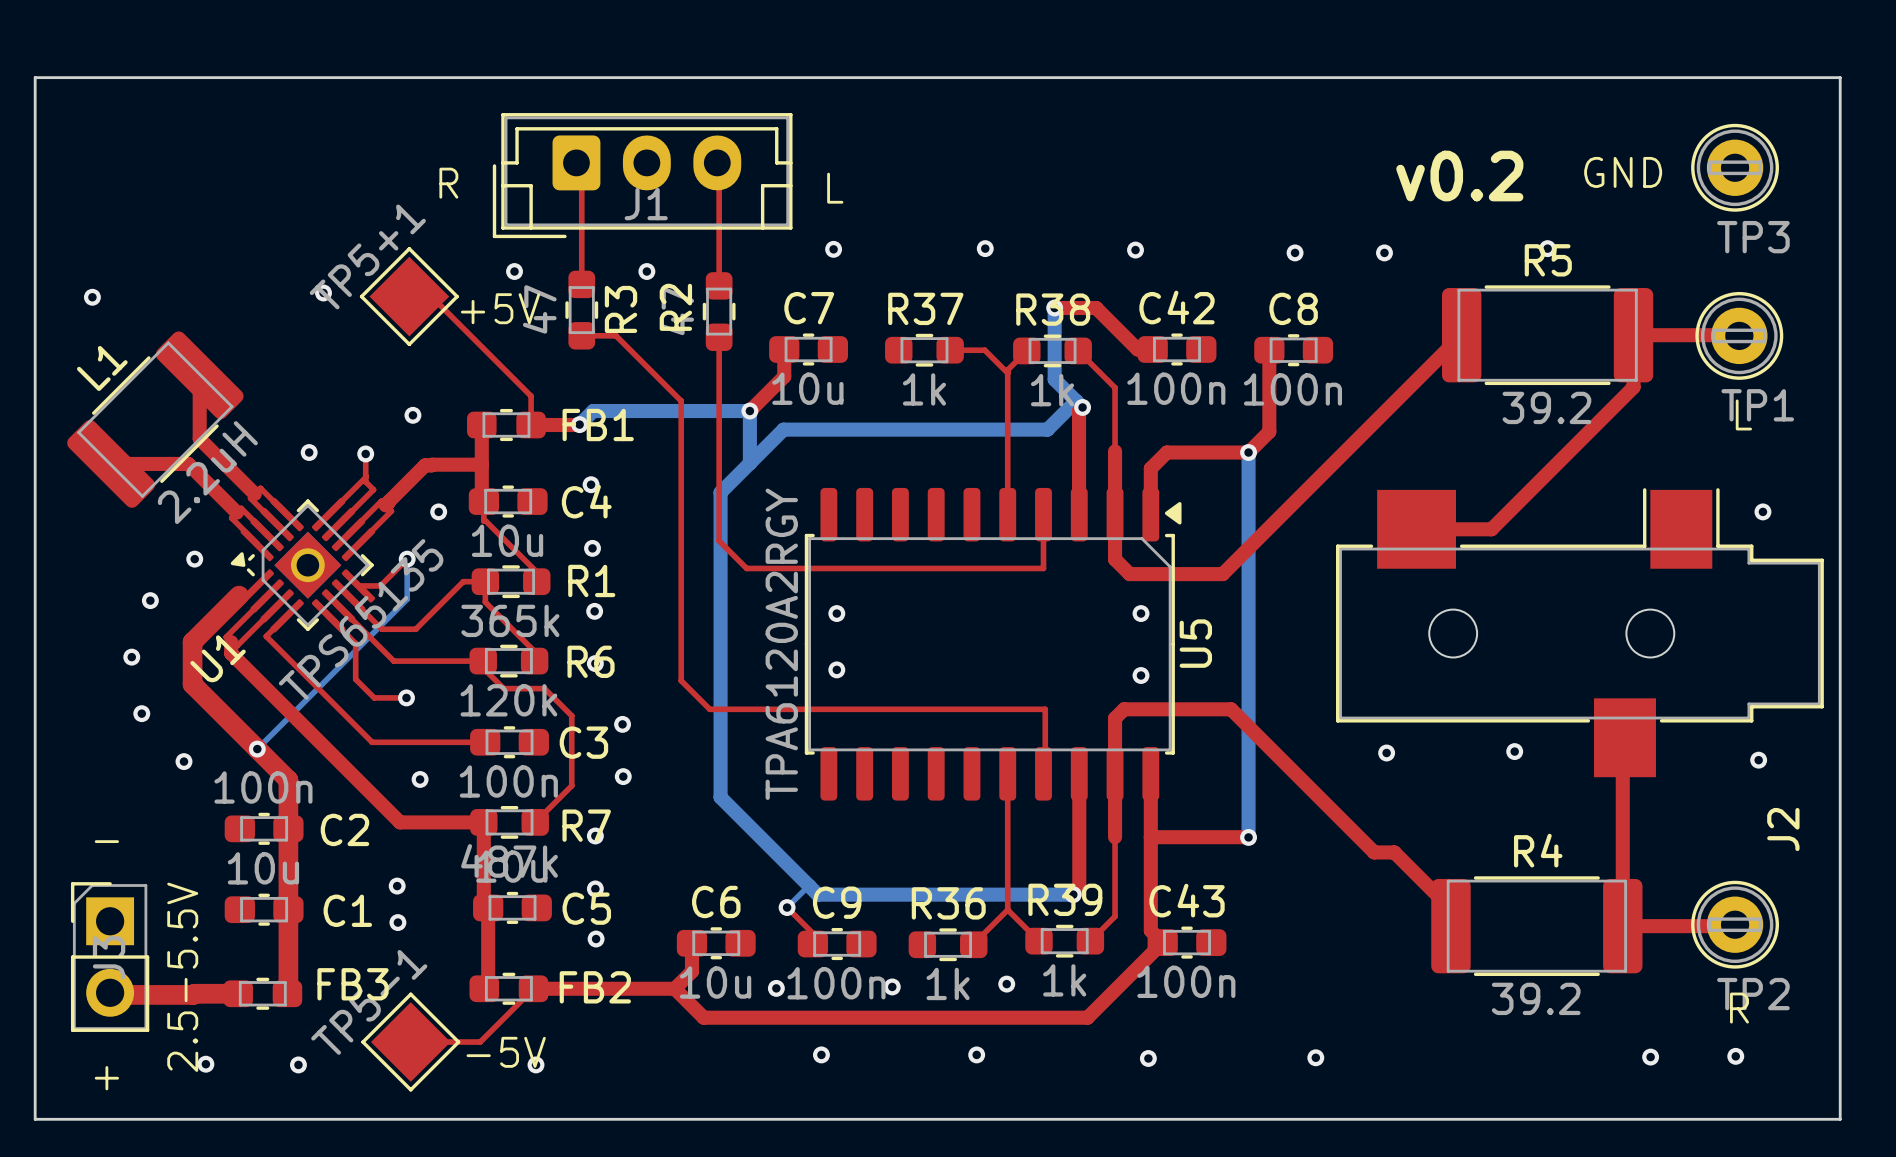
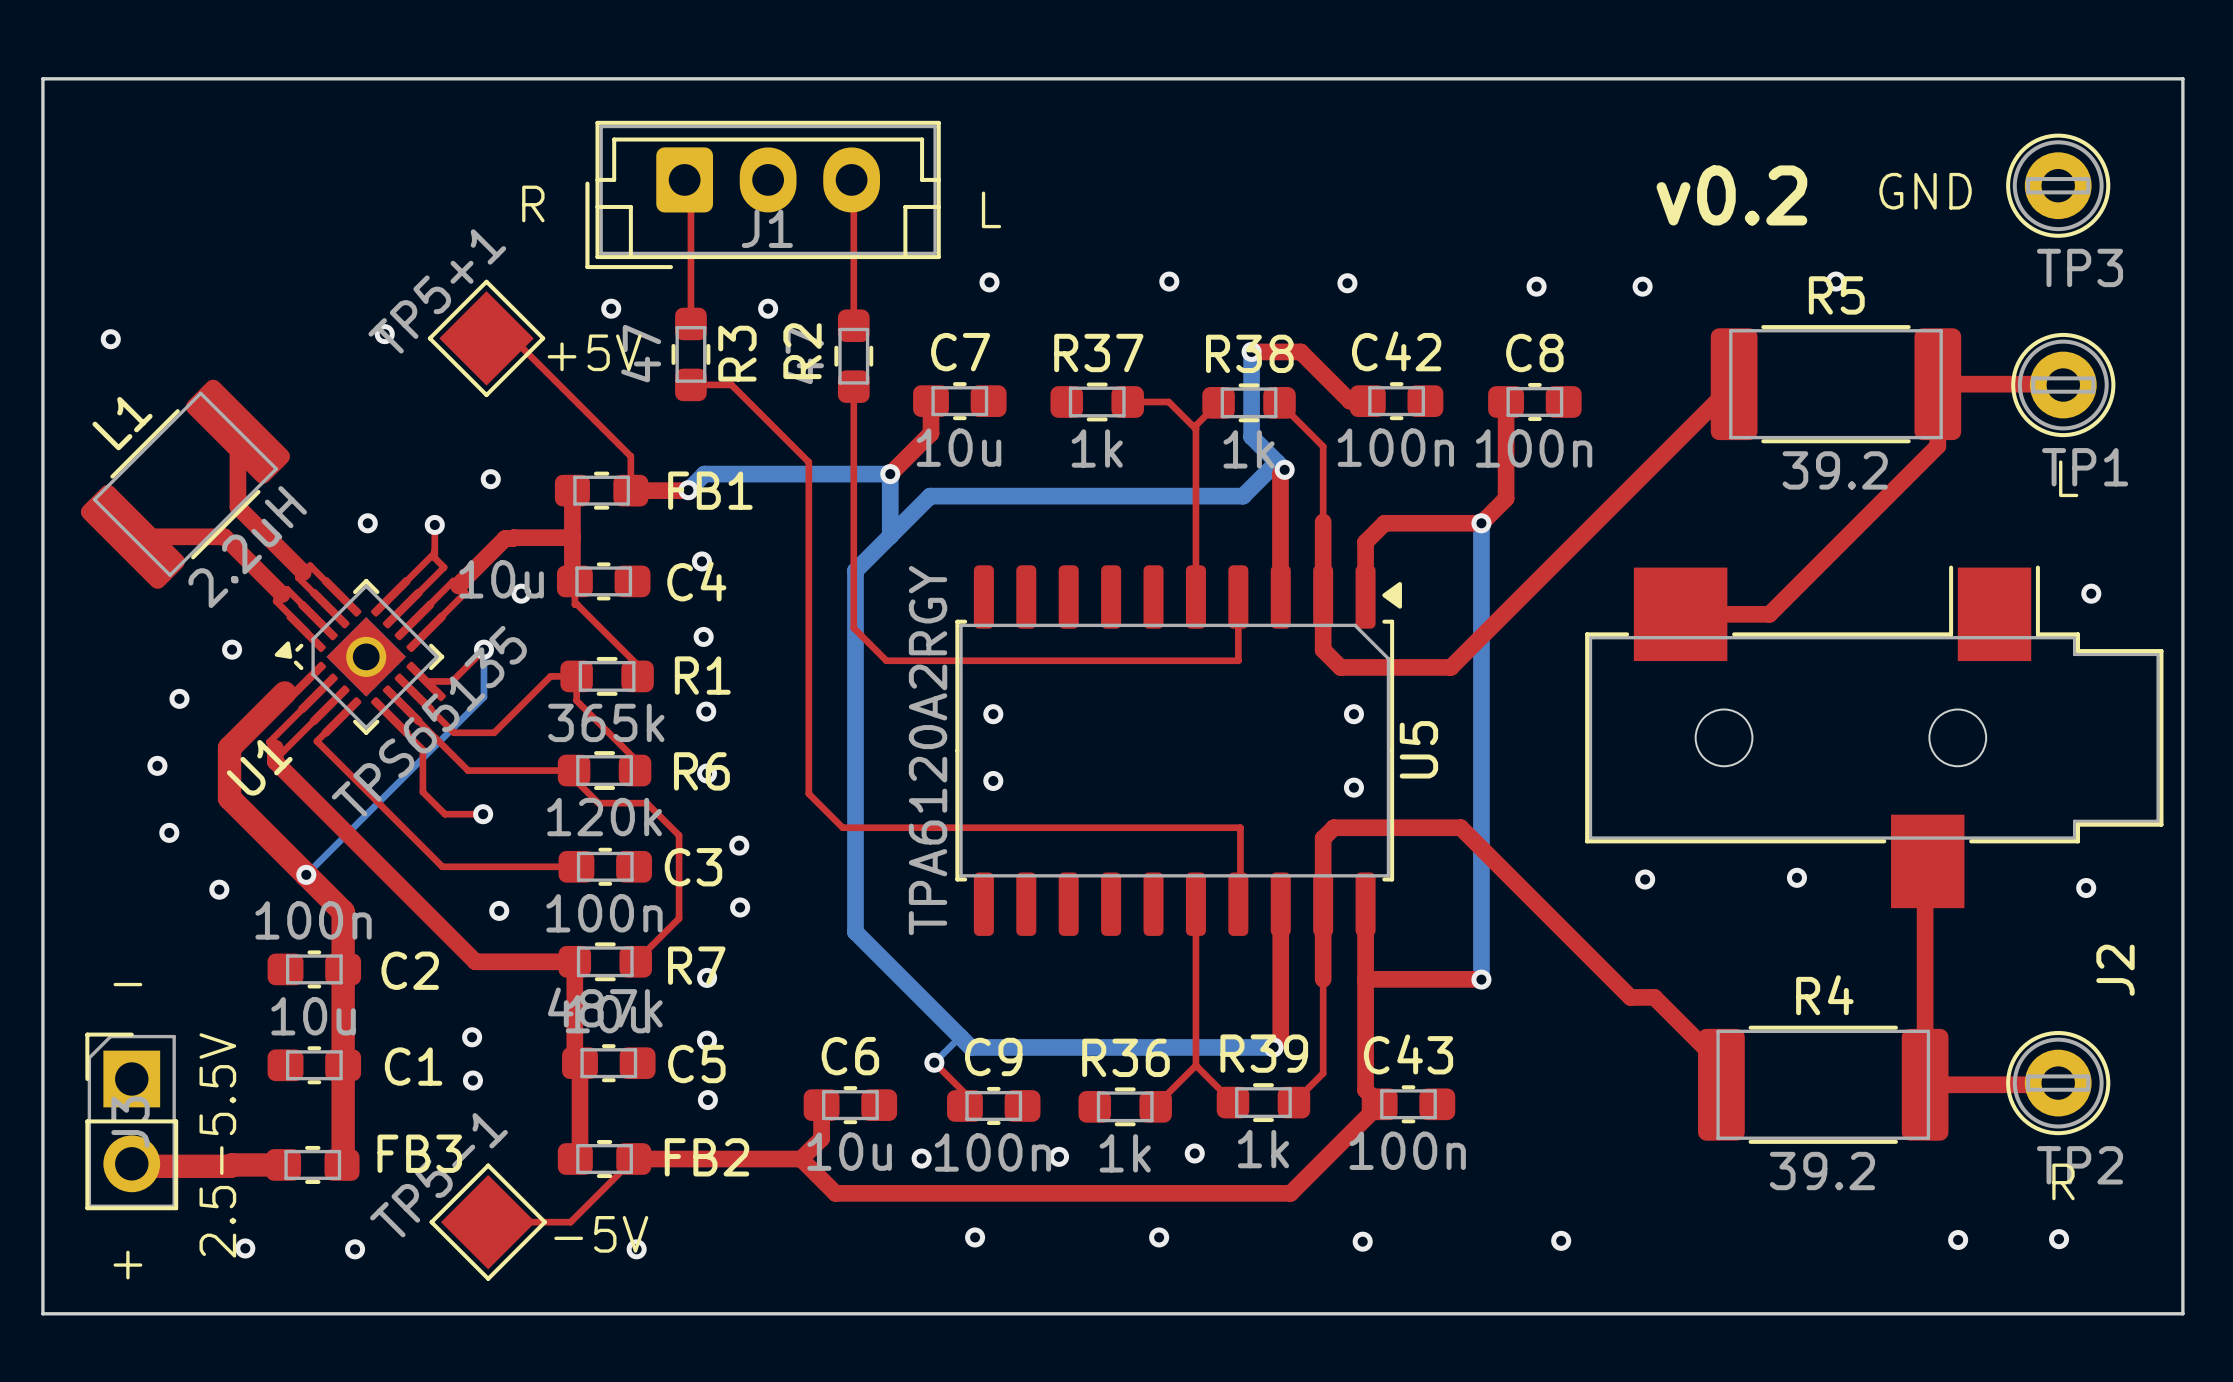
C4 value position: 10u (507, 540) -> 10u (501, 579)

